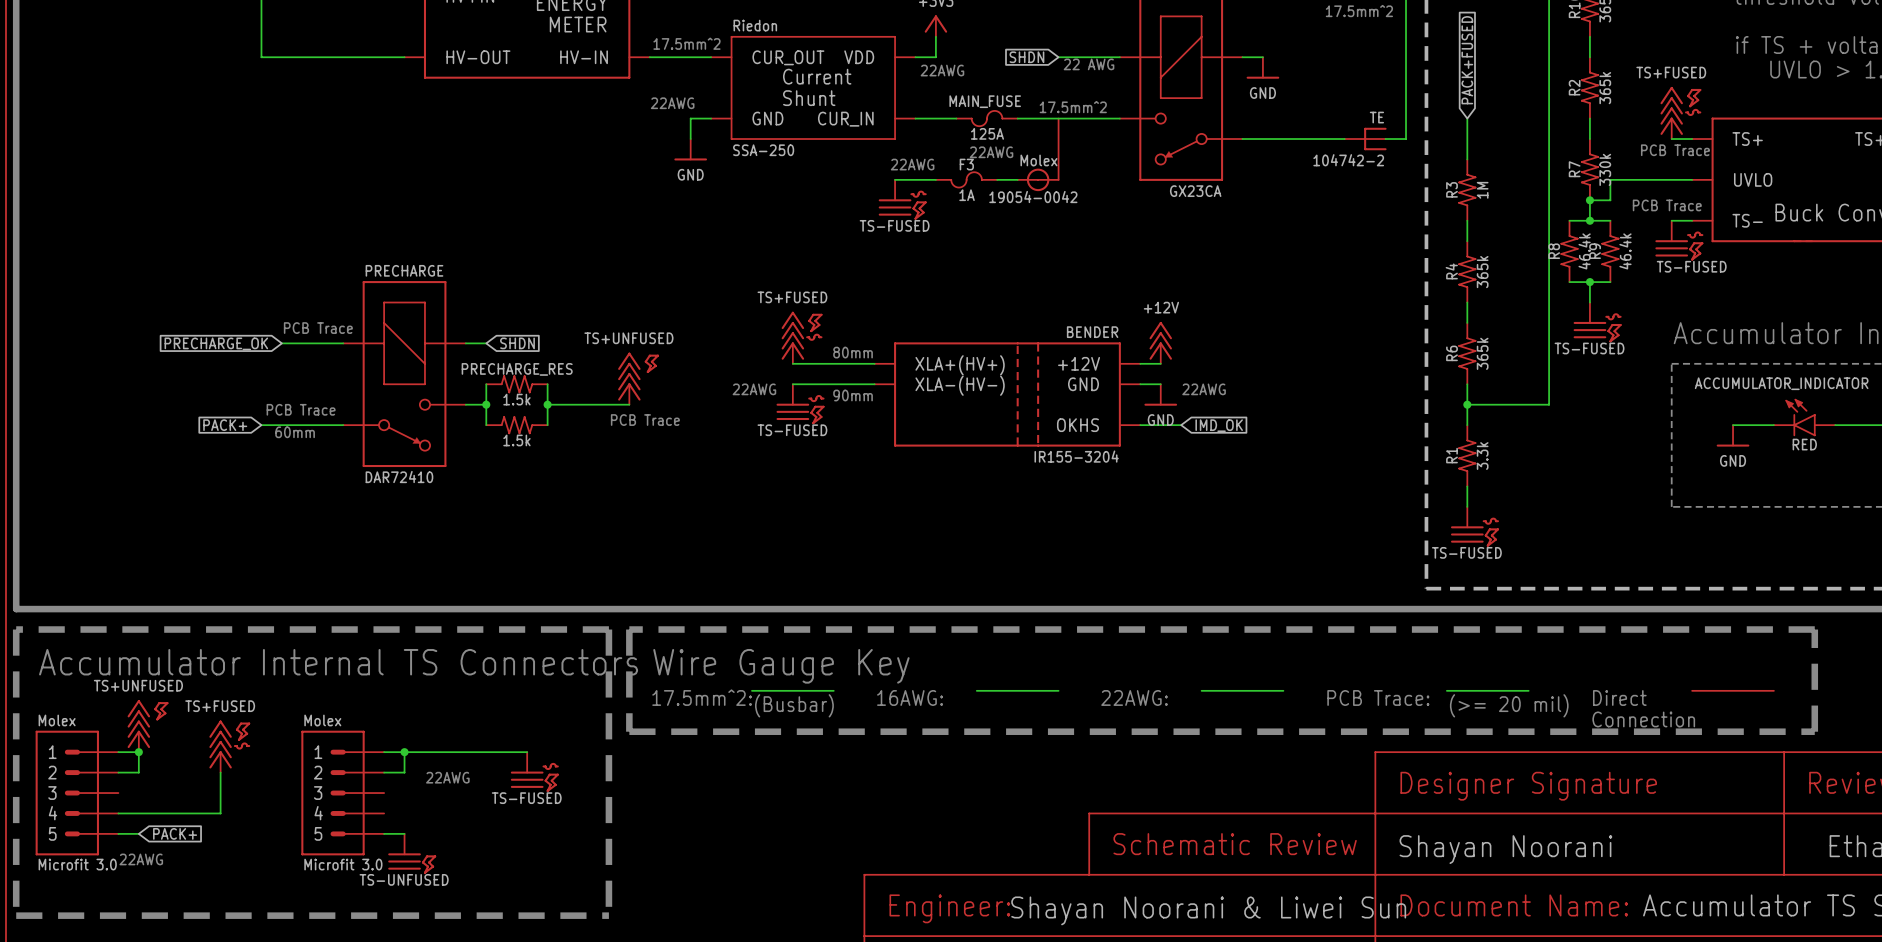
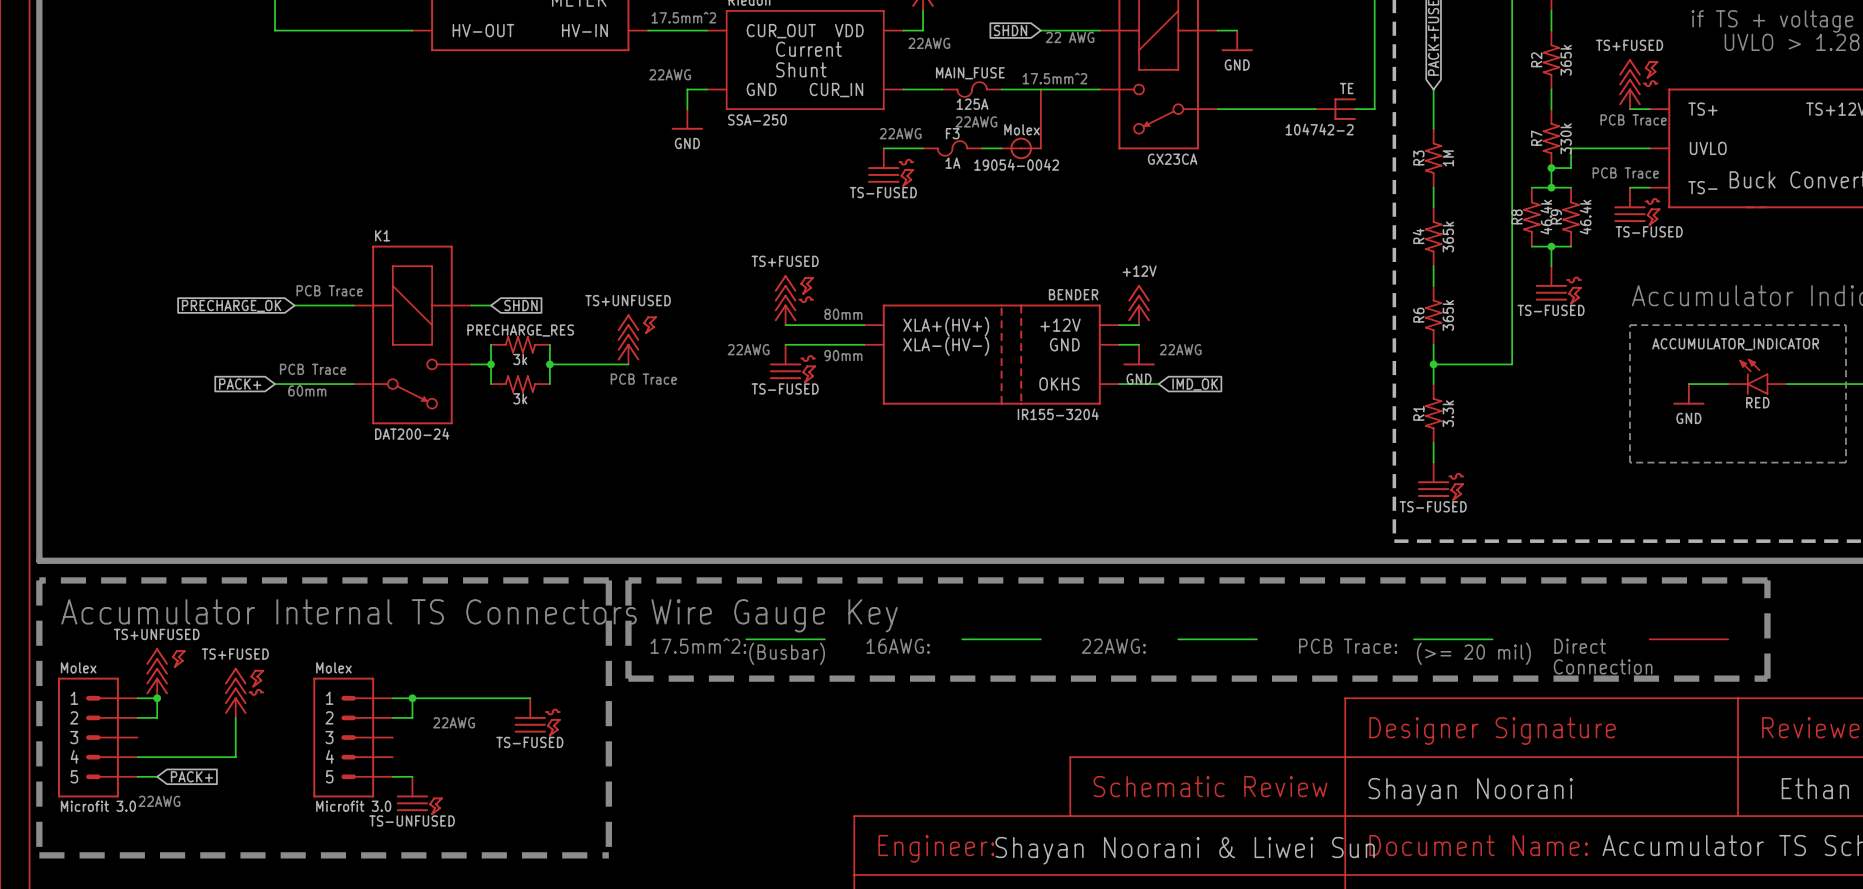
PRECHARGE name: PRECHARGE (404, 270) -> K1 (382, 235)
PRECHARGE_RES value: 1.5k (516, 399) -> 3k (520, 359)
part value: 1.5k (516, 440) -> 3k (520, 398)
PRECHARGE text: DAR72410 (399, 477) -> DAT200-24 (412, 433)

